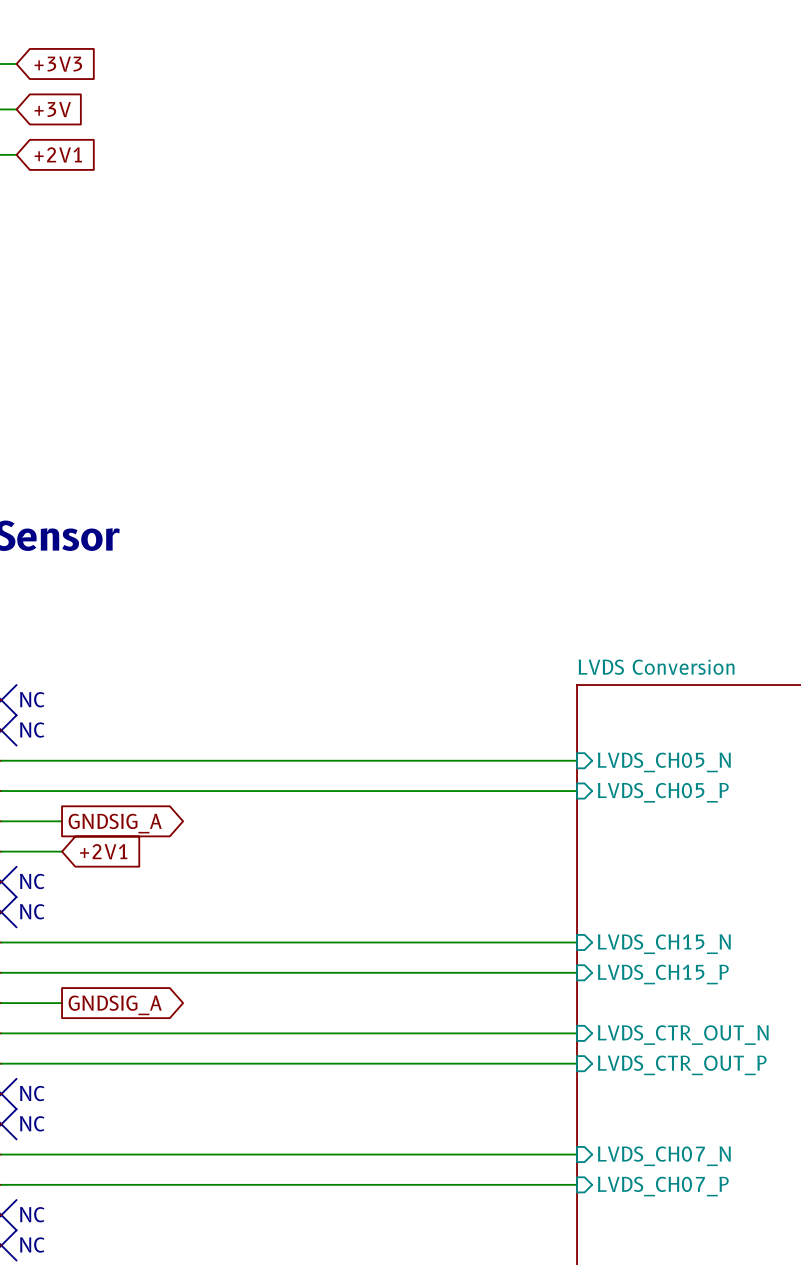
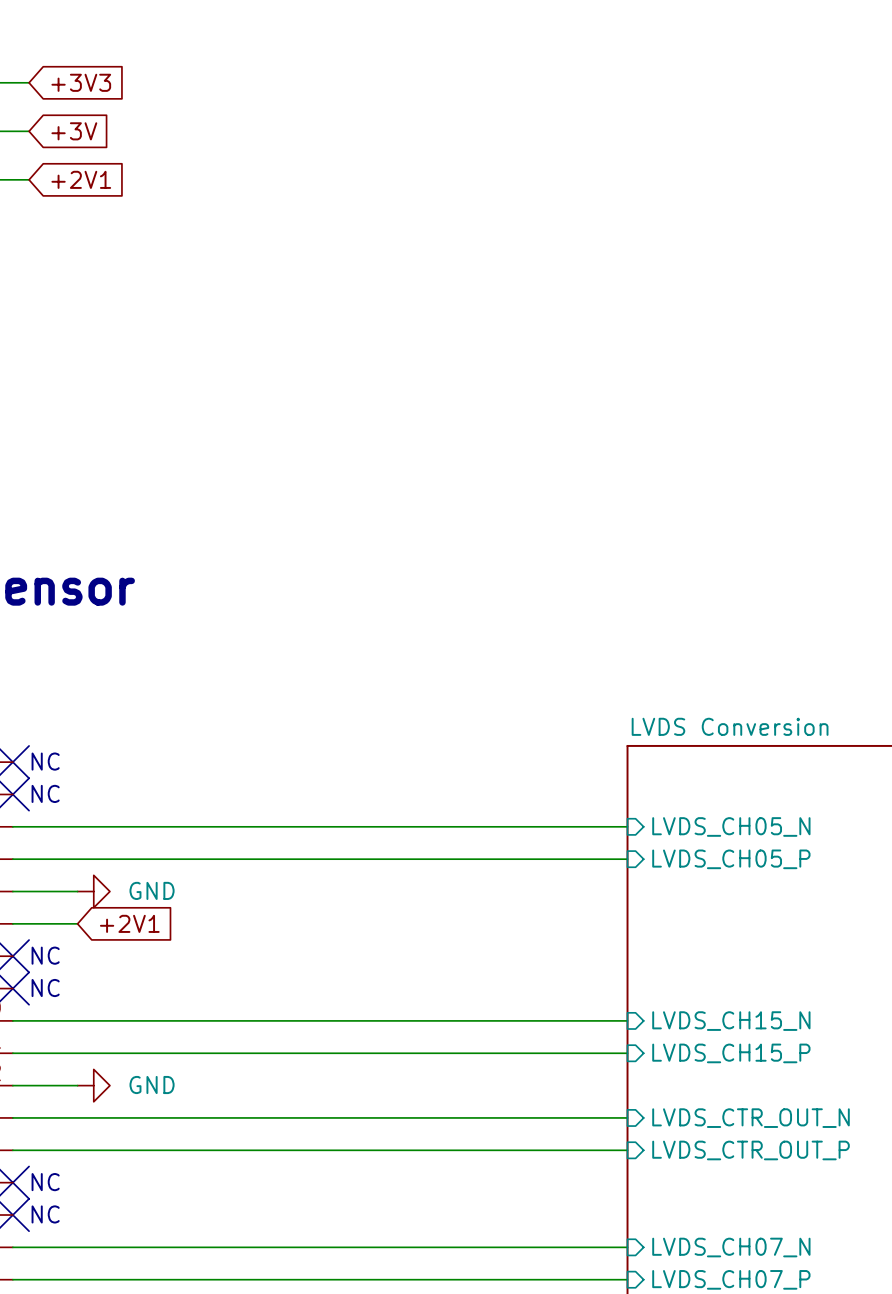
power symbol: none -> GND (93, 891)
global label: GNDSIG_A (115, 823) -> none
power symbol: none -> GND (93, 1085)
global label: GNDSIG_A (115, 1005) -> none

